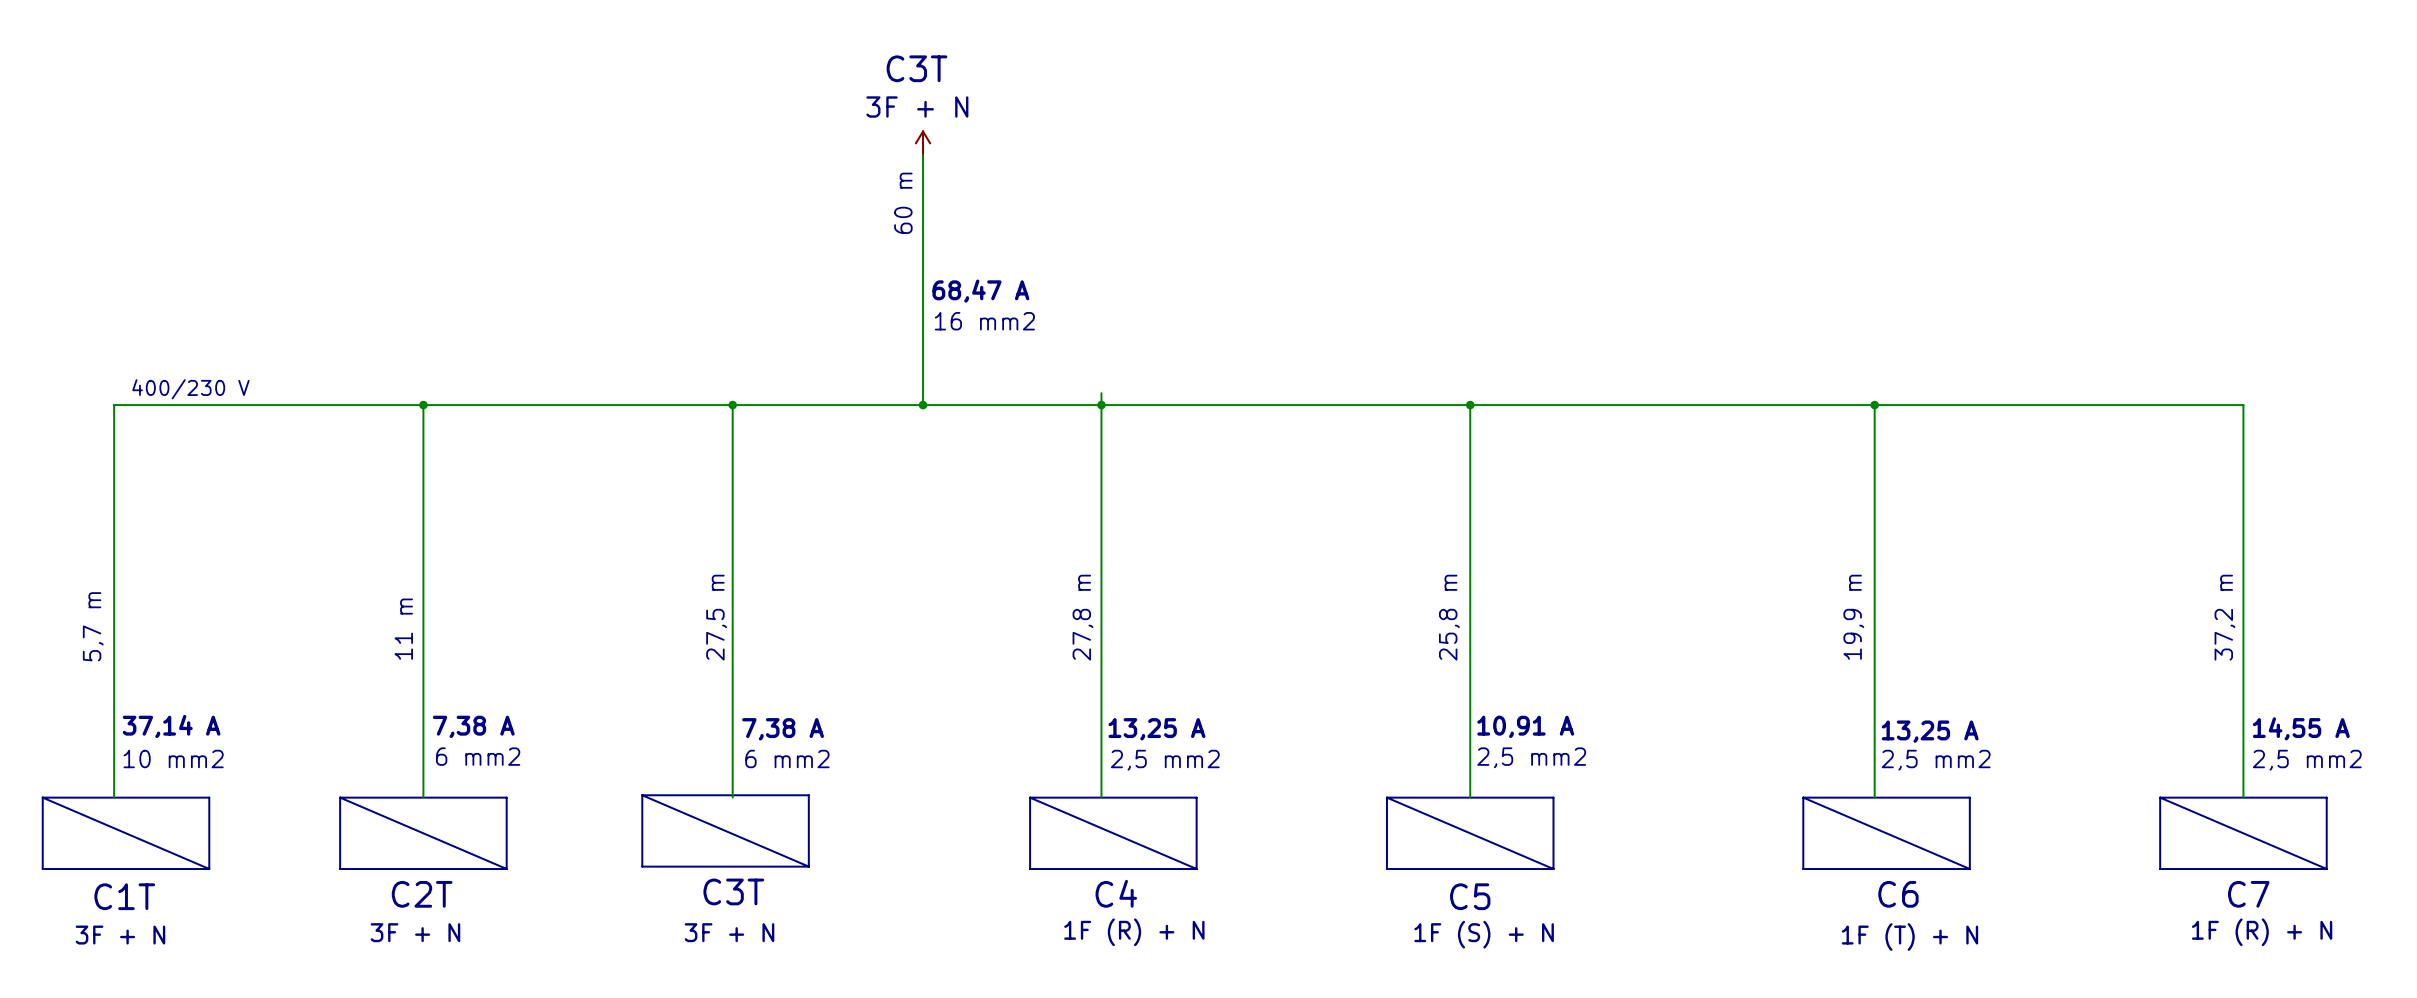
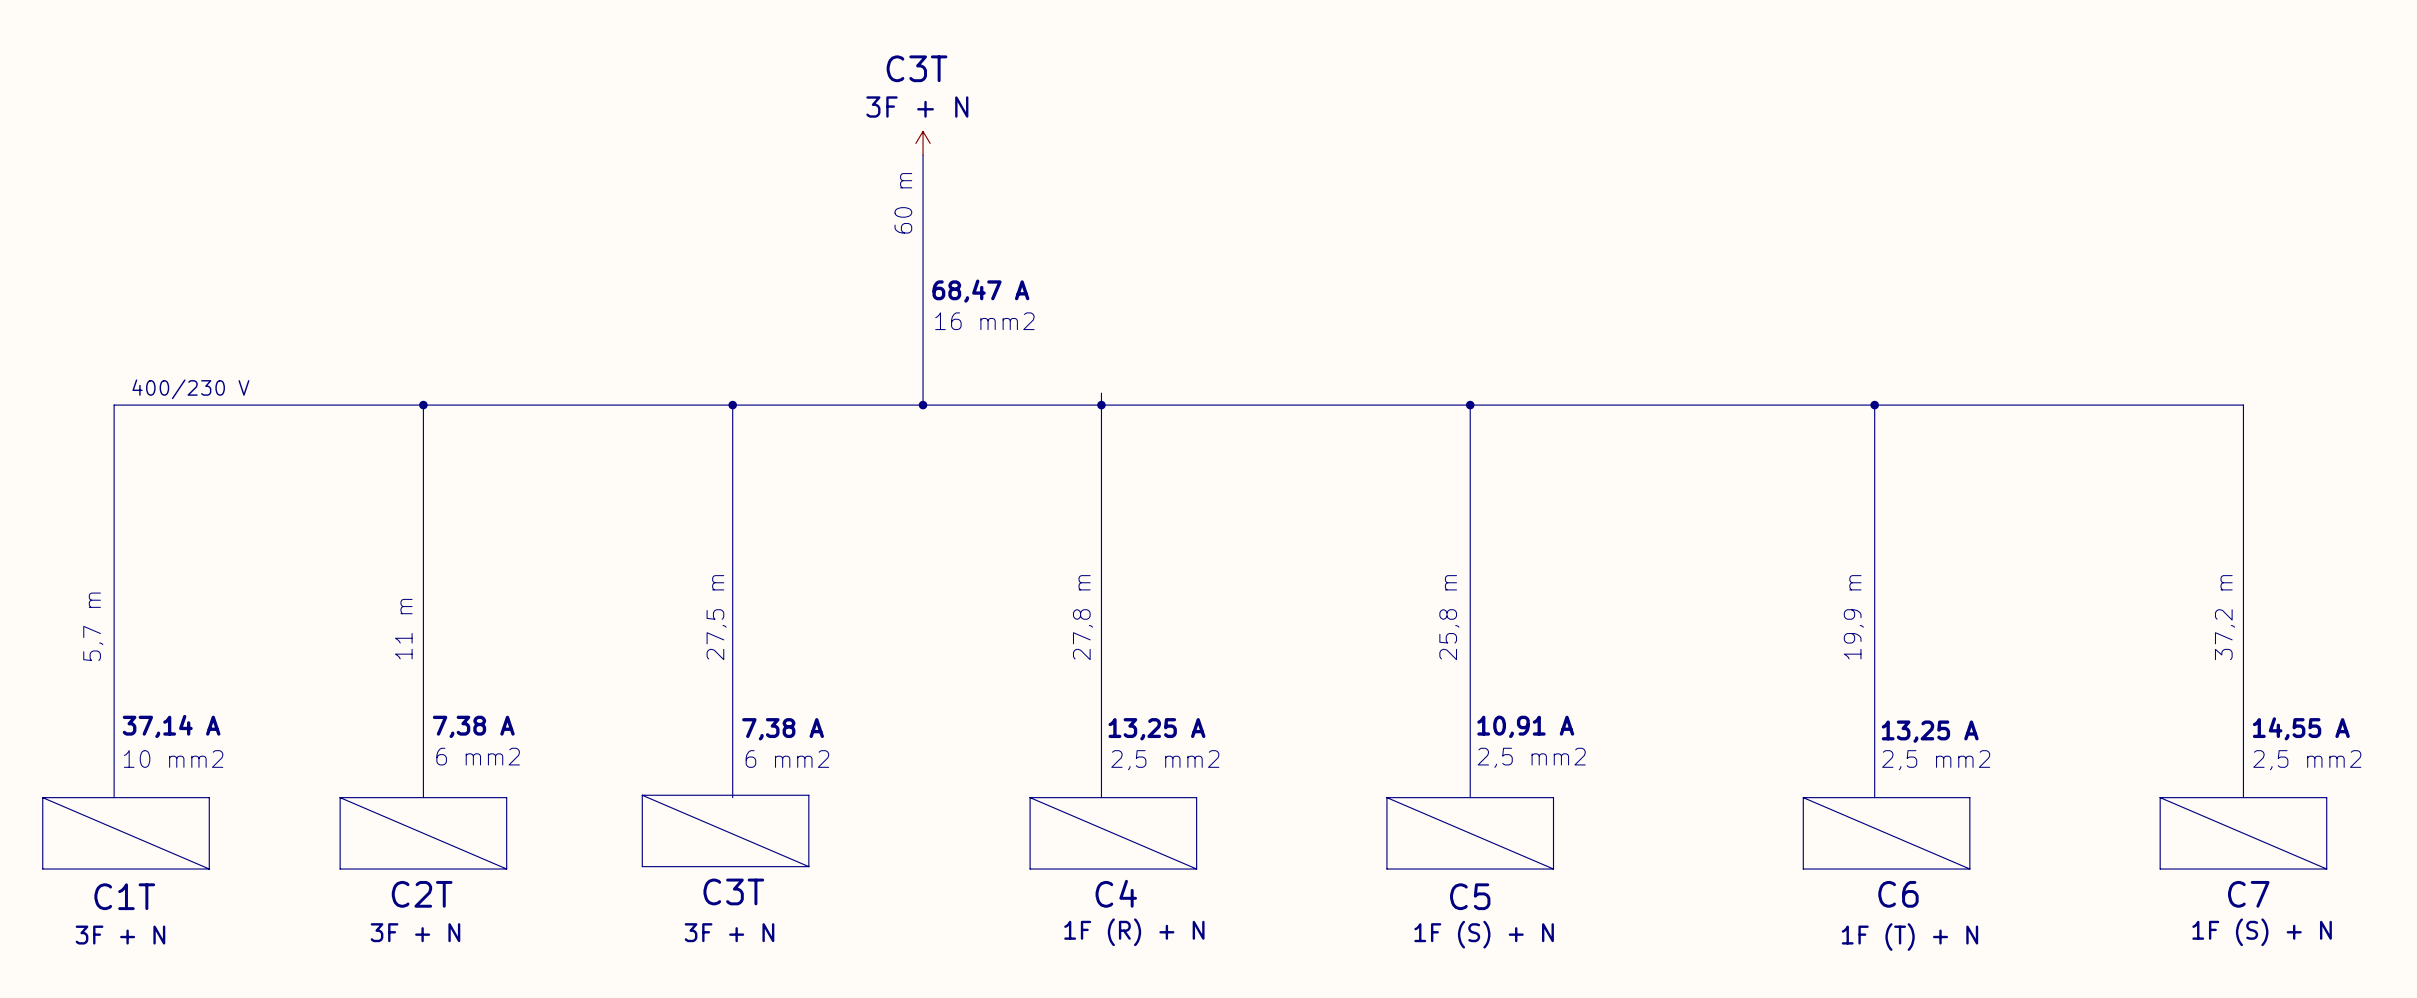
text: 1F (R) + N (2262, 932) -> 1F (S) + N (2262, 932)

